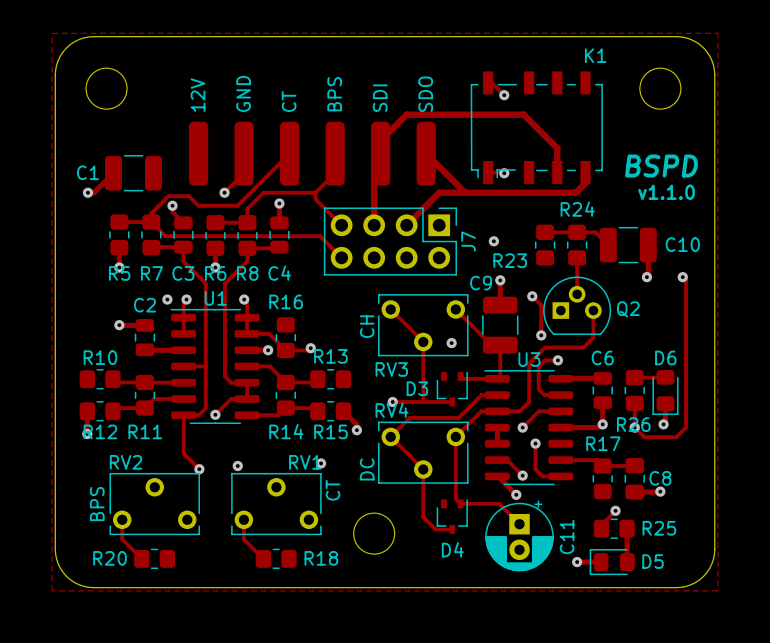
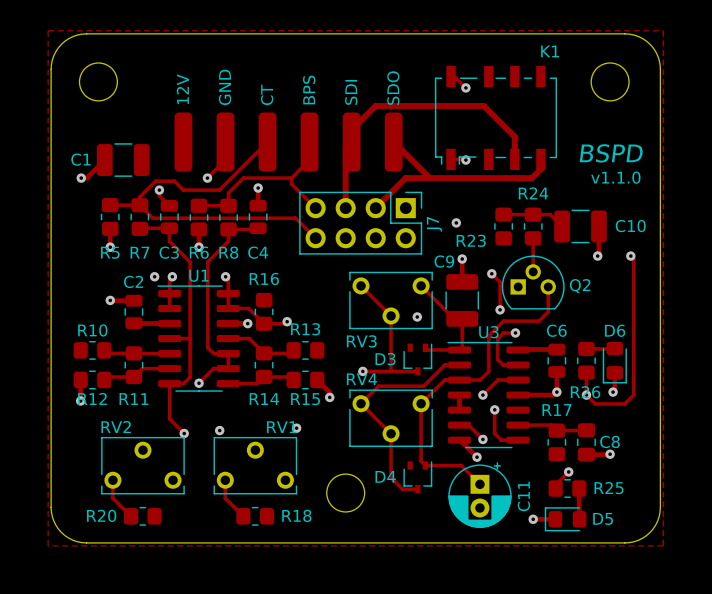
text: CH (367, 326) -> none
text: DC (367, 469) -> none
text: CT (333, 490) -> none
text: BPS (97, 504) -> none
D4 name position: D4 (452, 549) -> D4 (385, 476)

